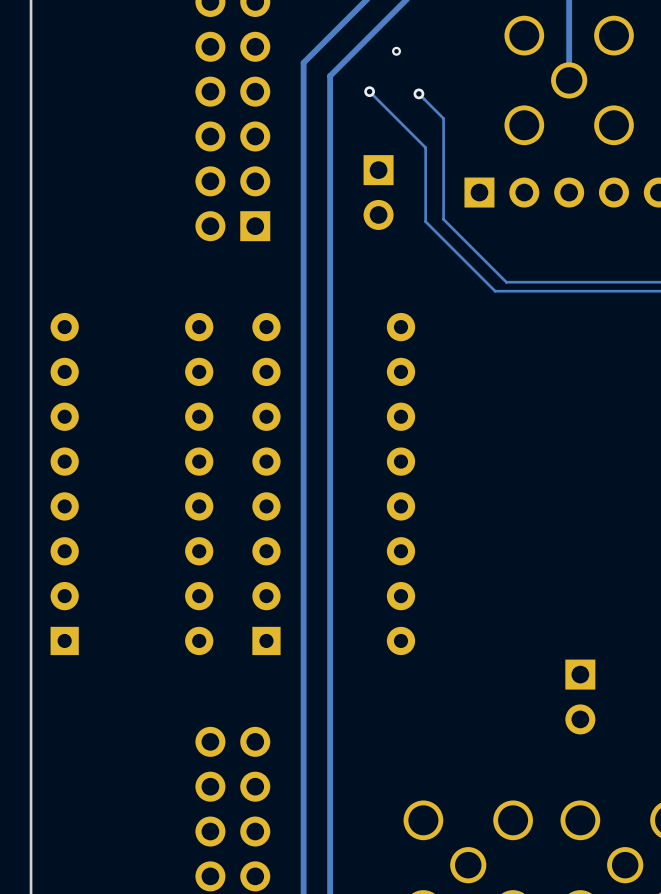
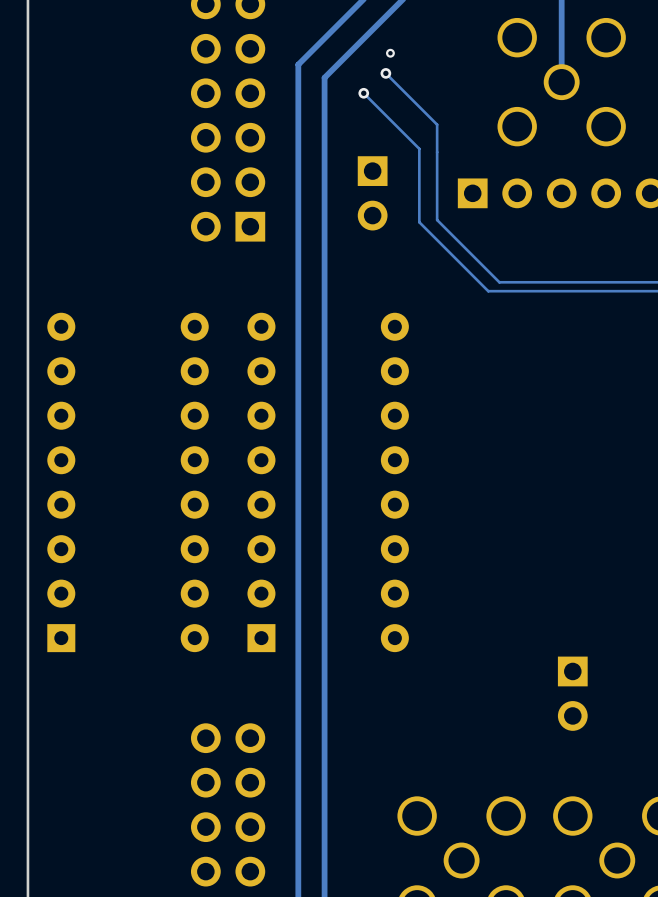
track: (418, 93) (443, 118) (443, 123) -> (385, 73) (437, 124)
via position: (418, 93) -> (385, 73)

